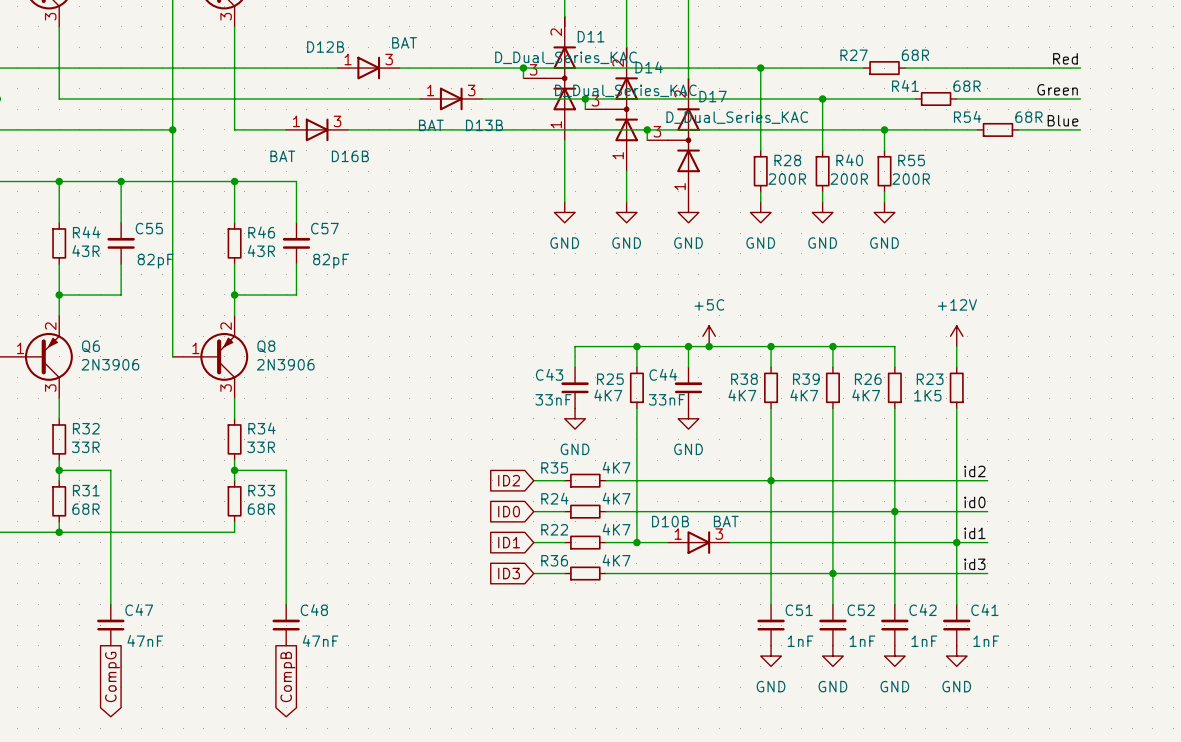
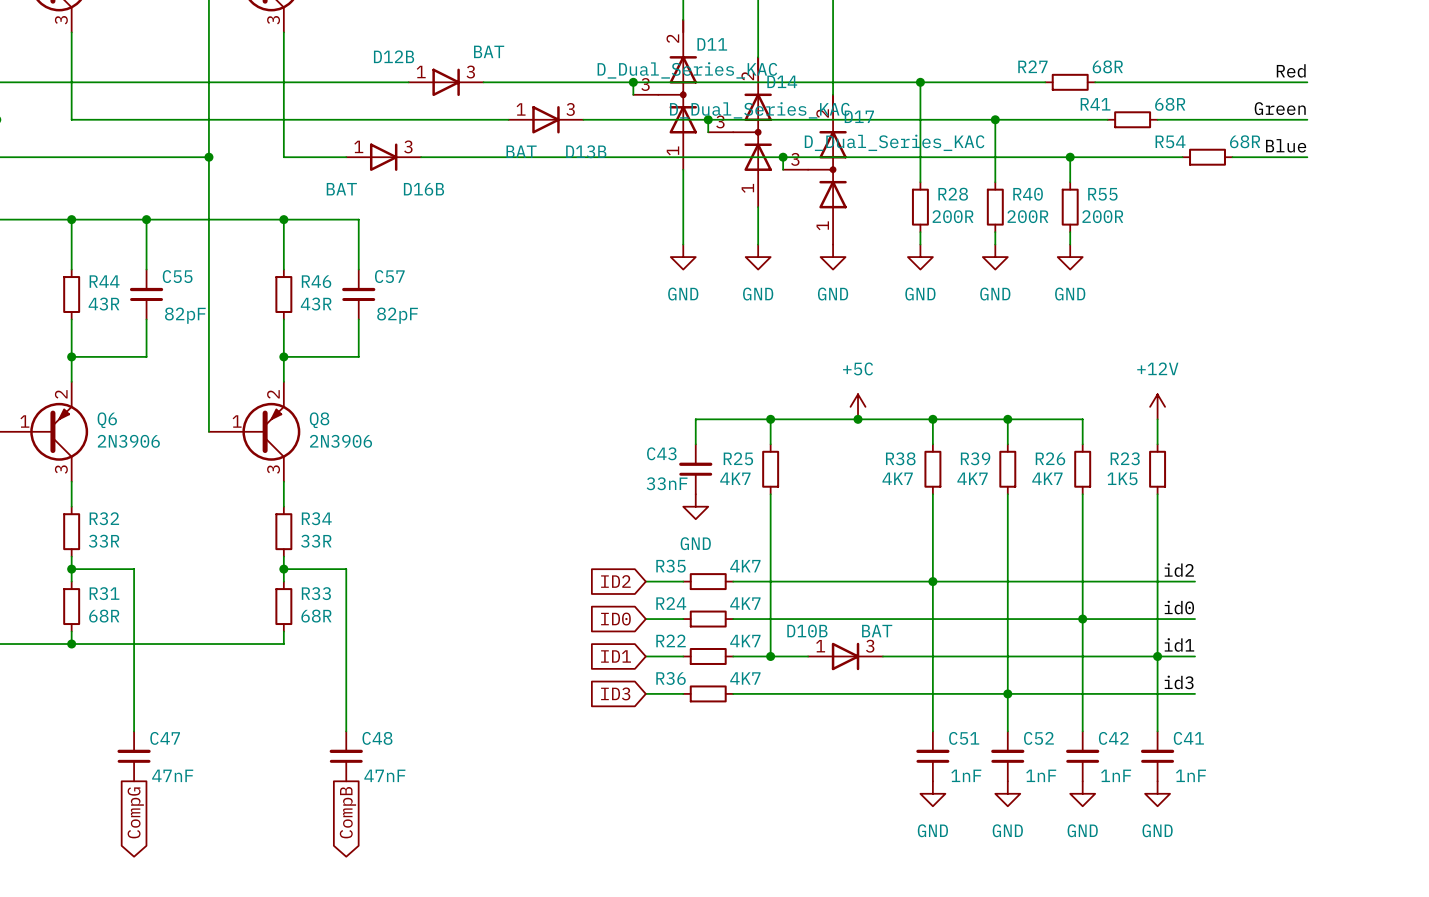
wire: (688, 346) (688, 367) -> none
junction: (688, 346) -> none
C44: 33nF (688, 387) -> none
power symbol: GND (688, 418) -> none

